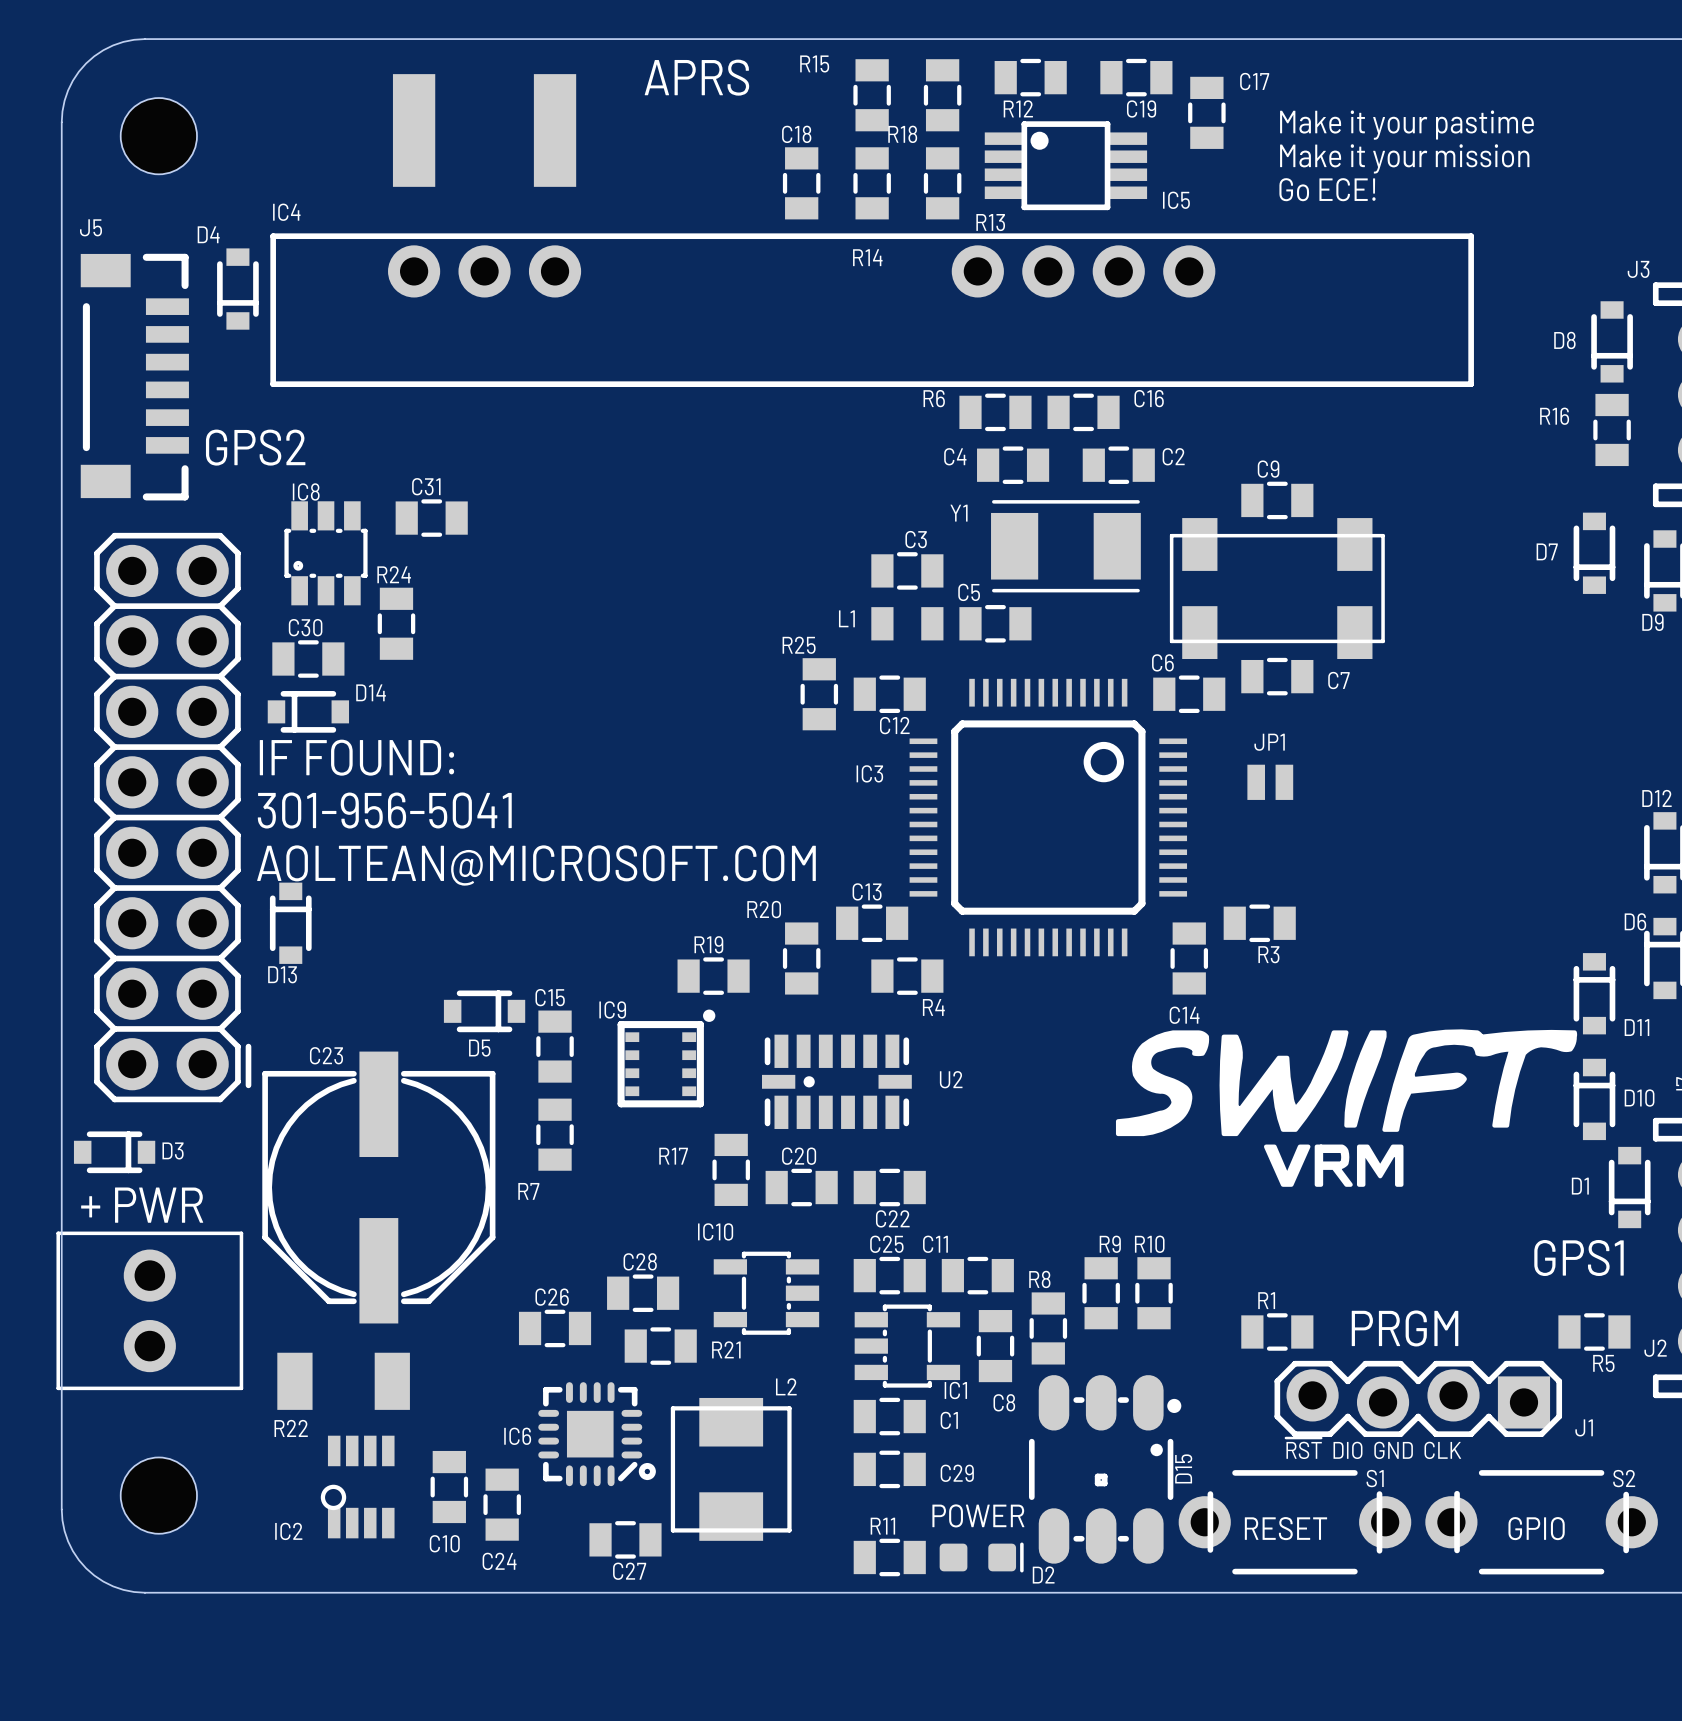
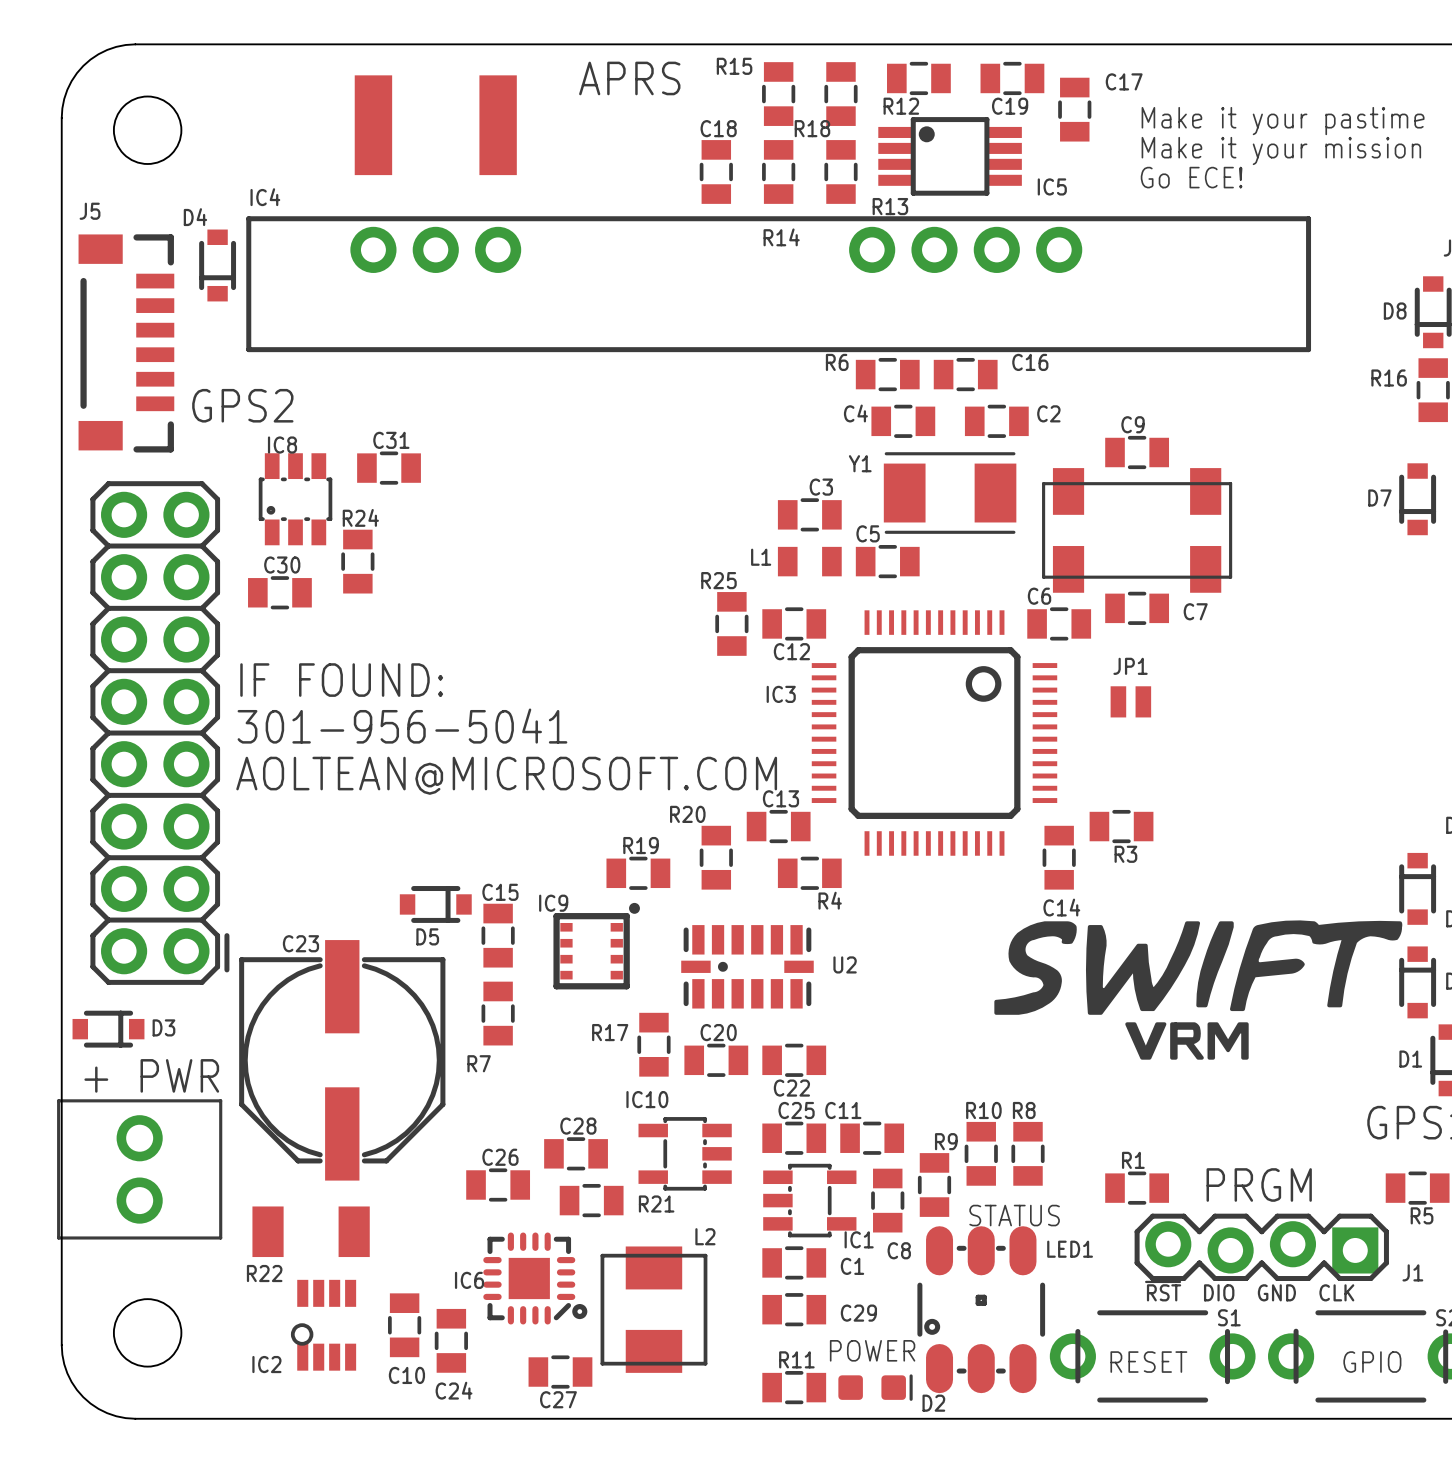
D14: (308, 711) -> none
D13: (290, 923) -> none
R9 name: R9 (1110, 1244) -> R10 (983, 1110)
R10 name: R10 (1149, 1244) -> R8 (1024, 1110)
R8 name: R8 (1039, 1279) -> R9 (946, 1141)
LED1: none -> STATUS (981, 1309)
D15: (1105, 1469) -> none

